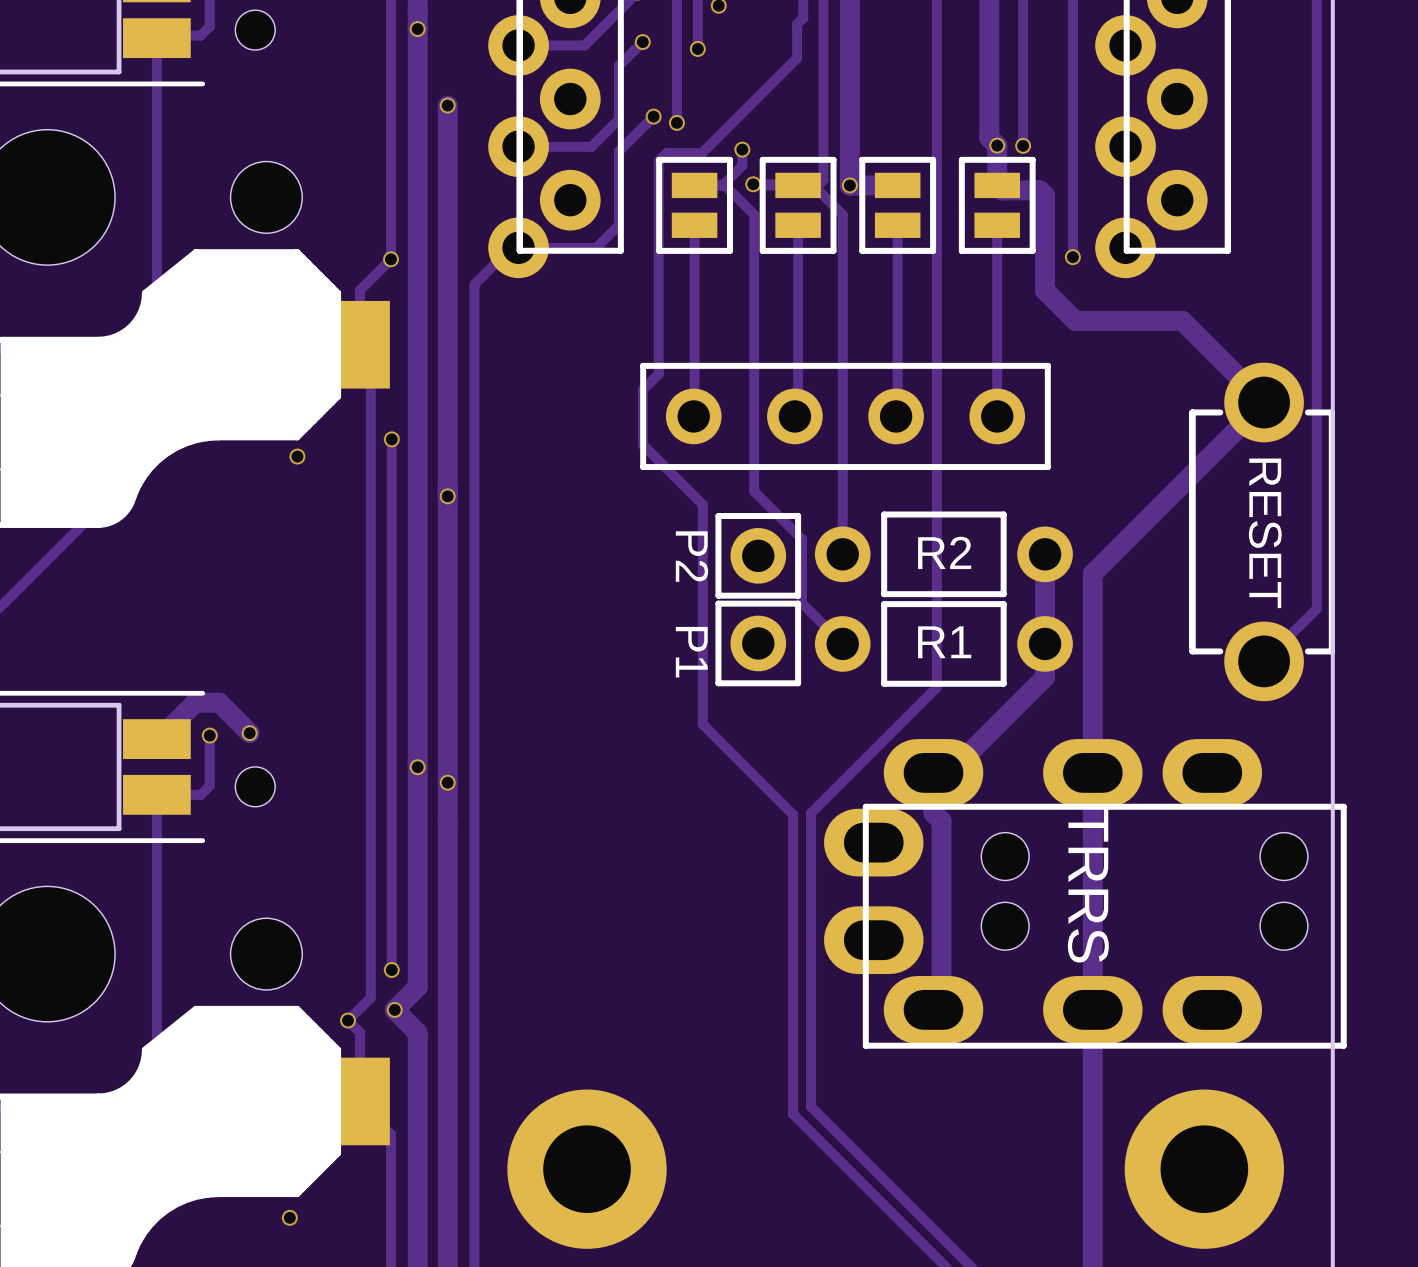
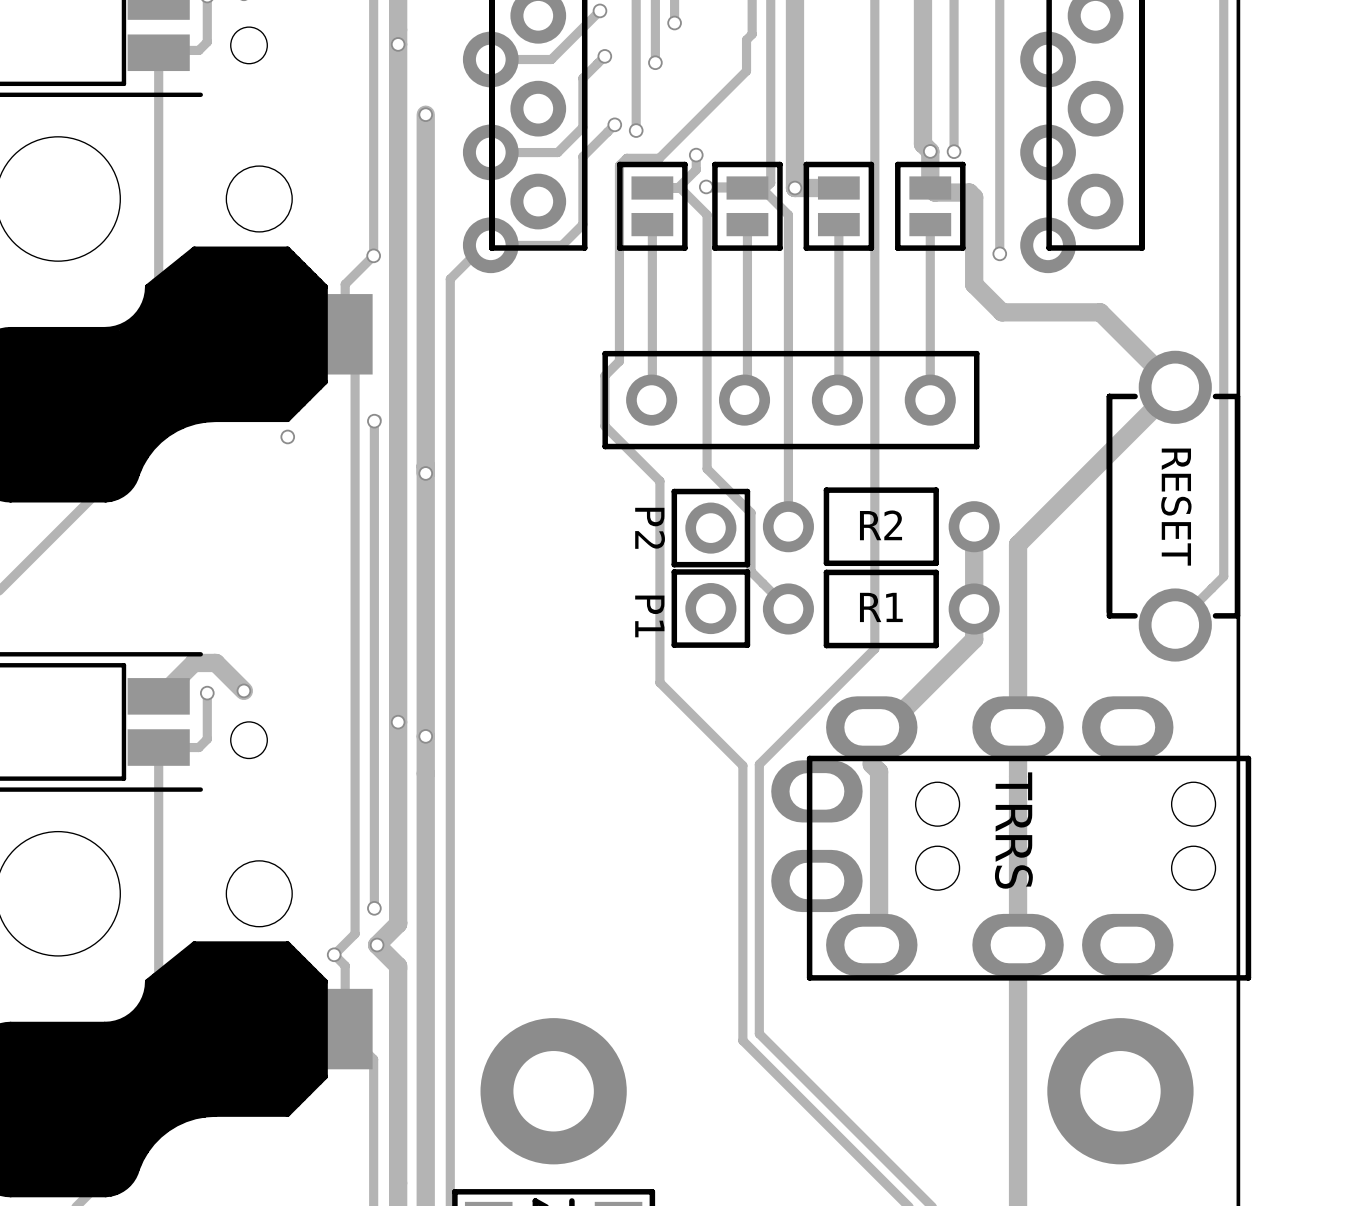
via: (289, 1217) -> none

